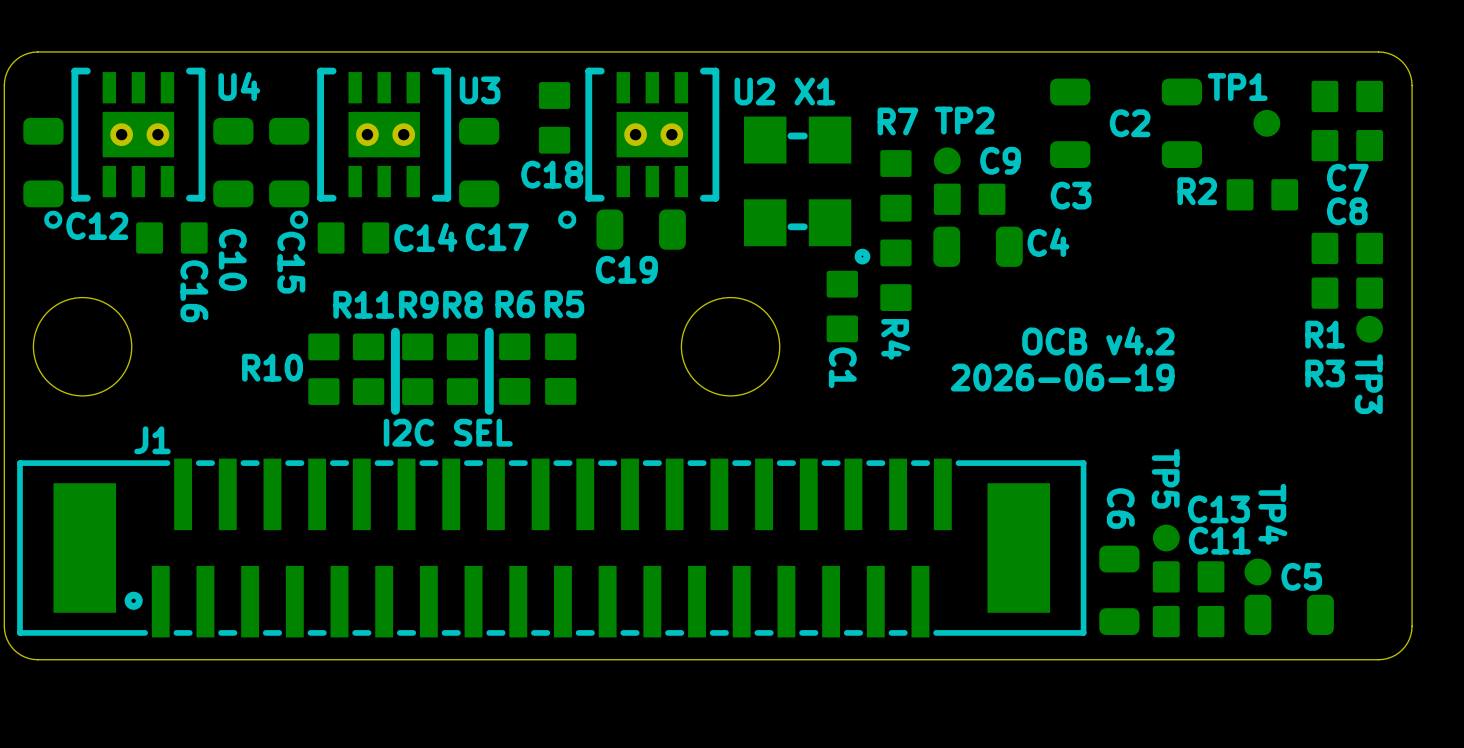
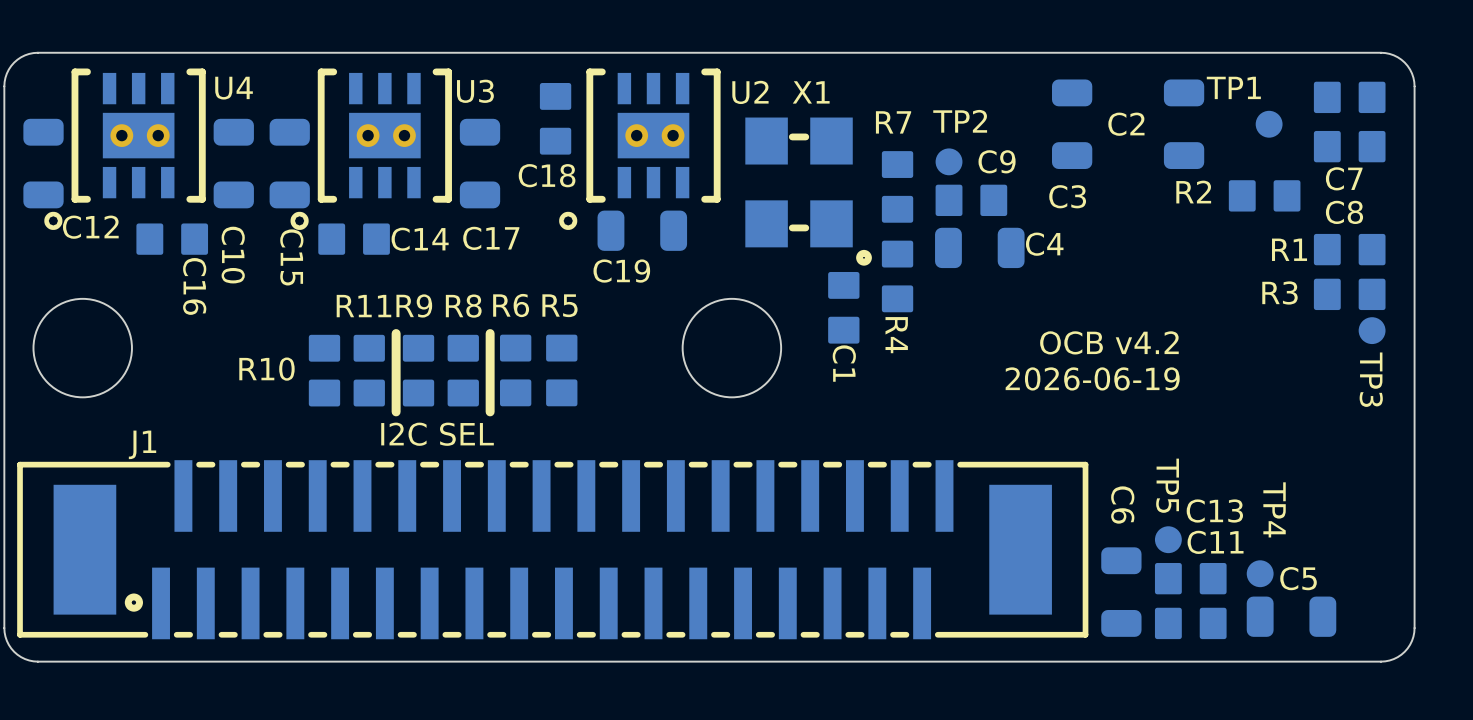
R1 name position: R1 (1325, 334) -> R1 (1289, 249)
R3 name position: R3 (1325, 373) -> R3 (1279, 292)

